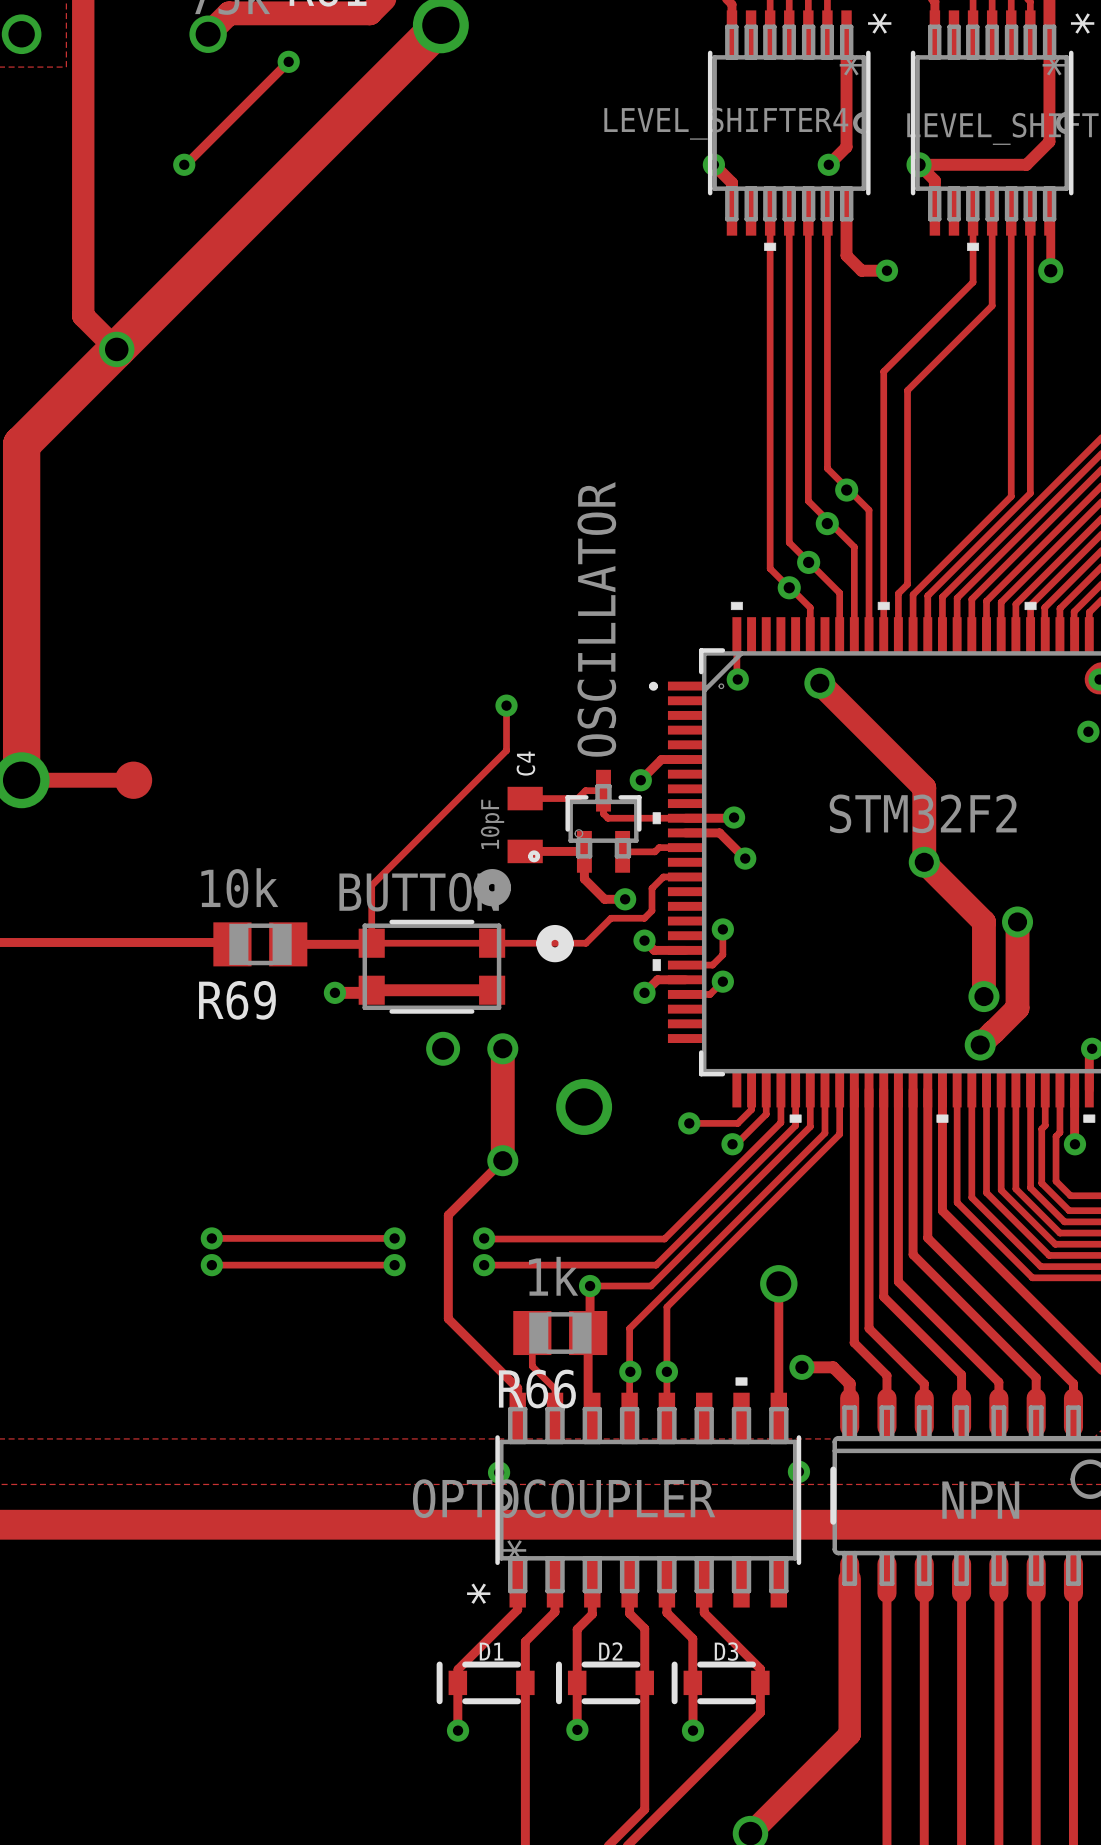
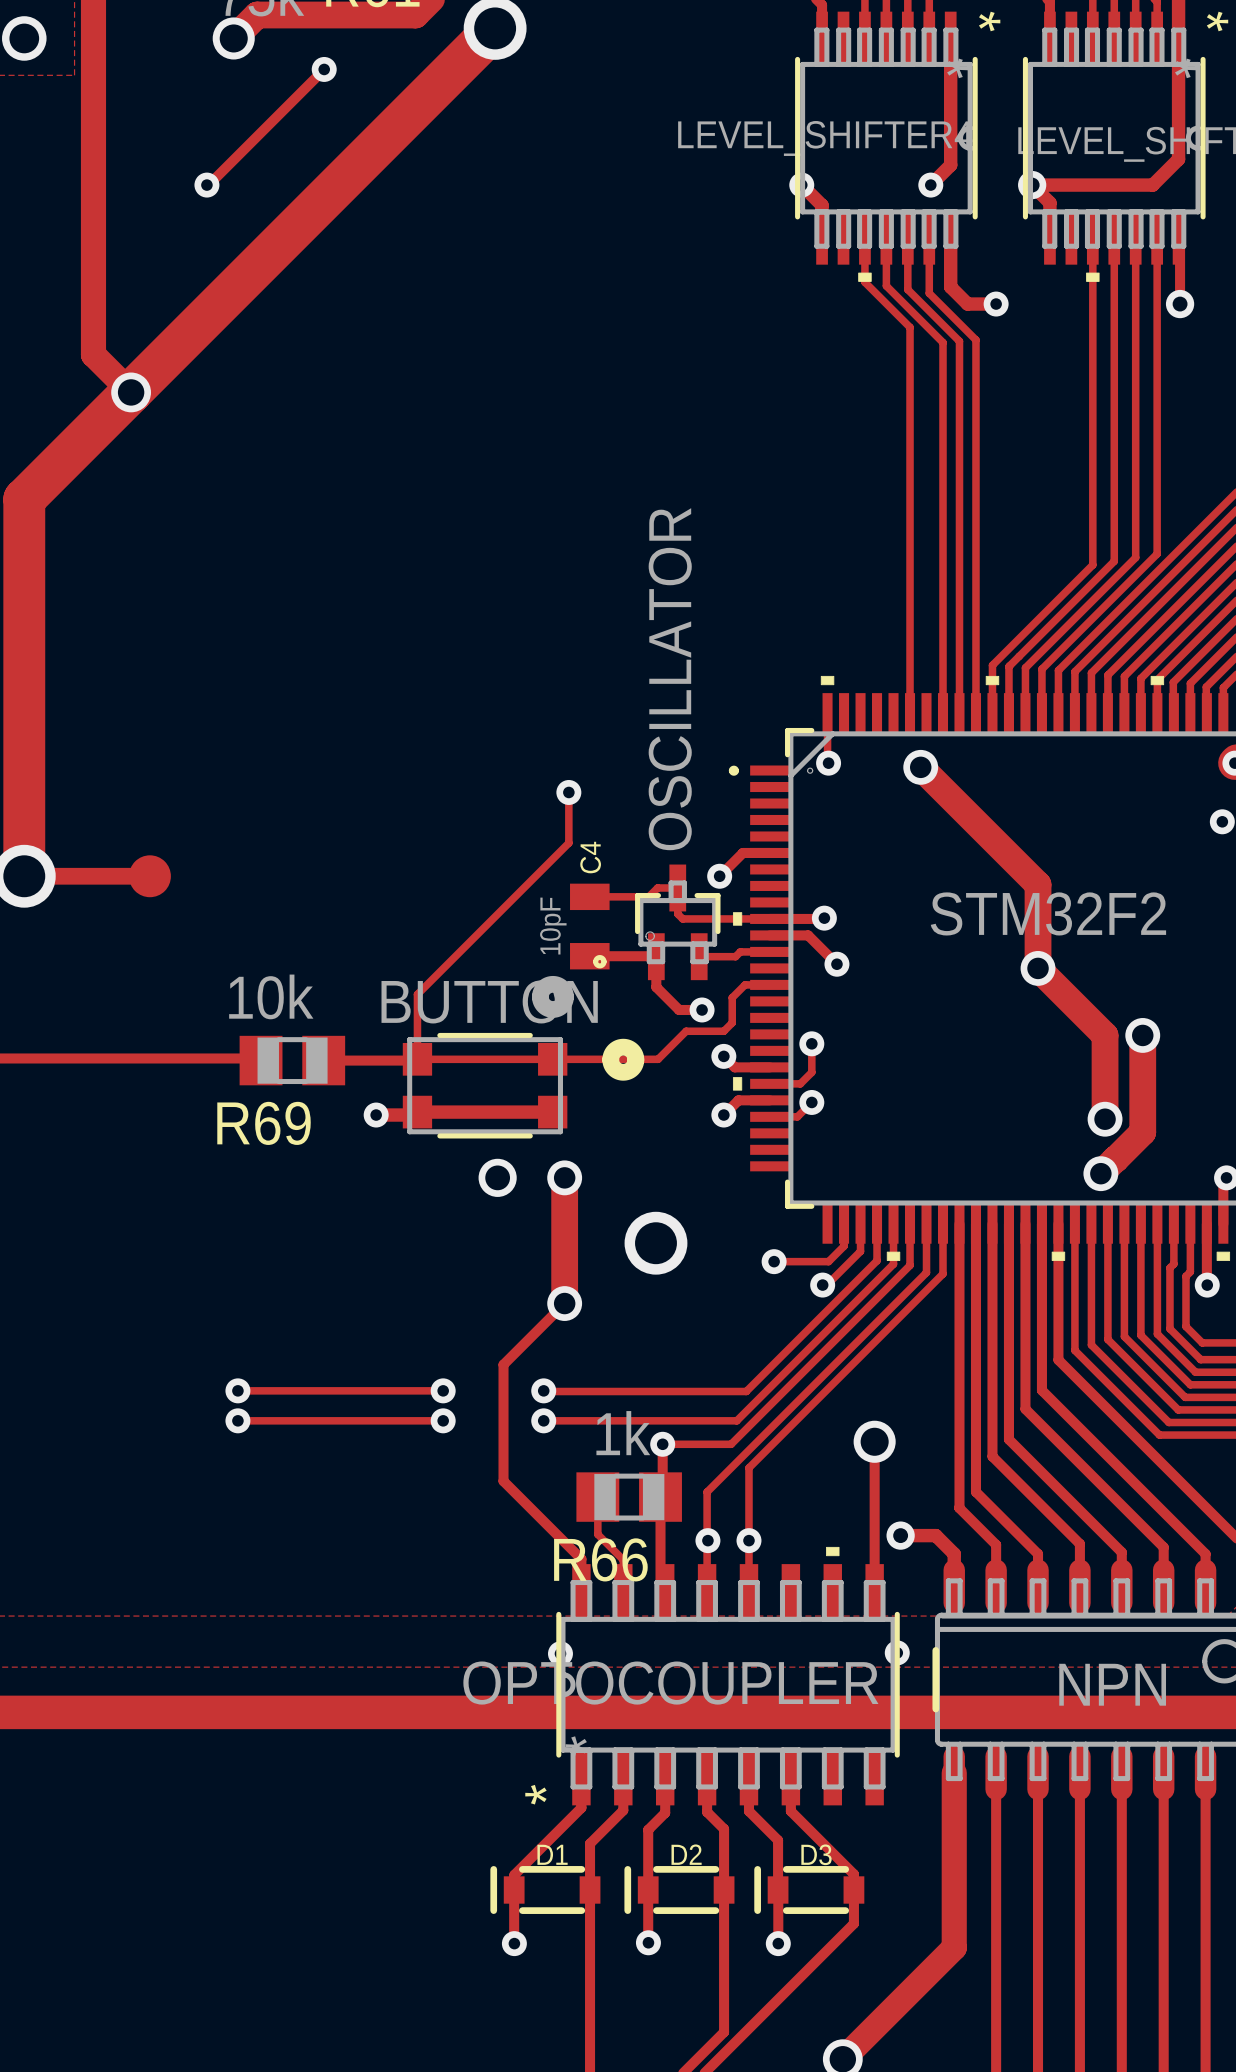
track: (770, 251) (770, 568) (810, 607) -> (864, 282) (910, 327) (910, 682)
track: (789, 254) (789, 542) (839, 592) -> (886, 285) (942, 342) (942, 665)
track: (808, 257) (808, 501) (854, 547) -> (907, 289) (959, 341) (959, 614)
track: (827, 261) (827, 468) (869, 510) -> (929, 293) (975, 340) (975, 572)
track: (973, 282) (883, 371) (883, 592) -> (1092, 316) (1092, 564) (992, 665)
track: (992, 305) (907, 390) (907, 584) -> (1114, 343) (1114, 561) (1019, 656)
via: (846, 490) -> none
via: (827, 523) -> none
via: (808, 562) -> none
via: (789, 587) -> none

